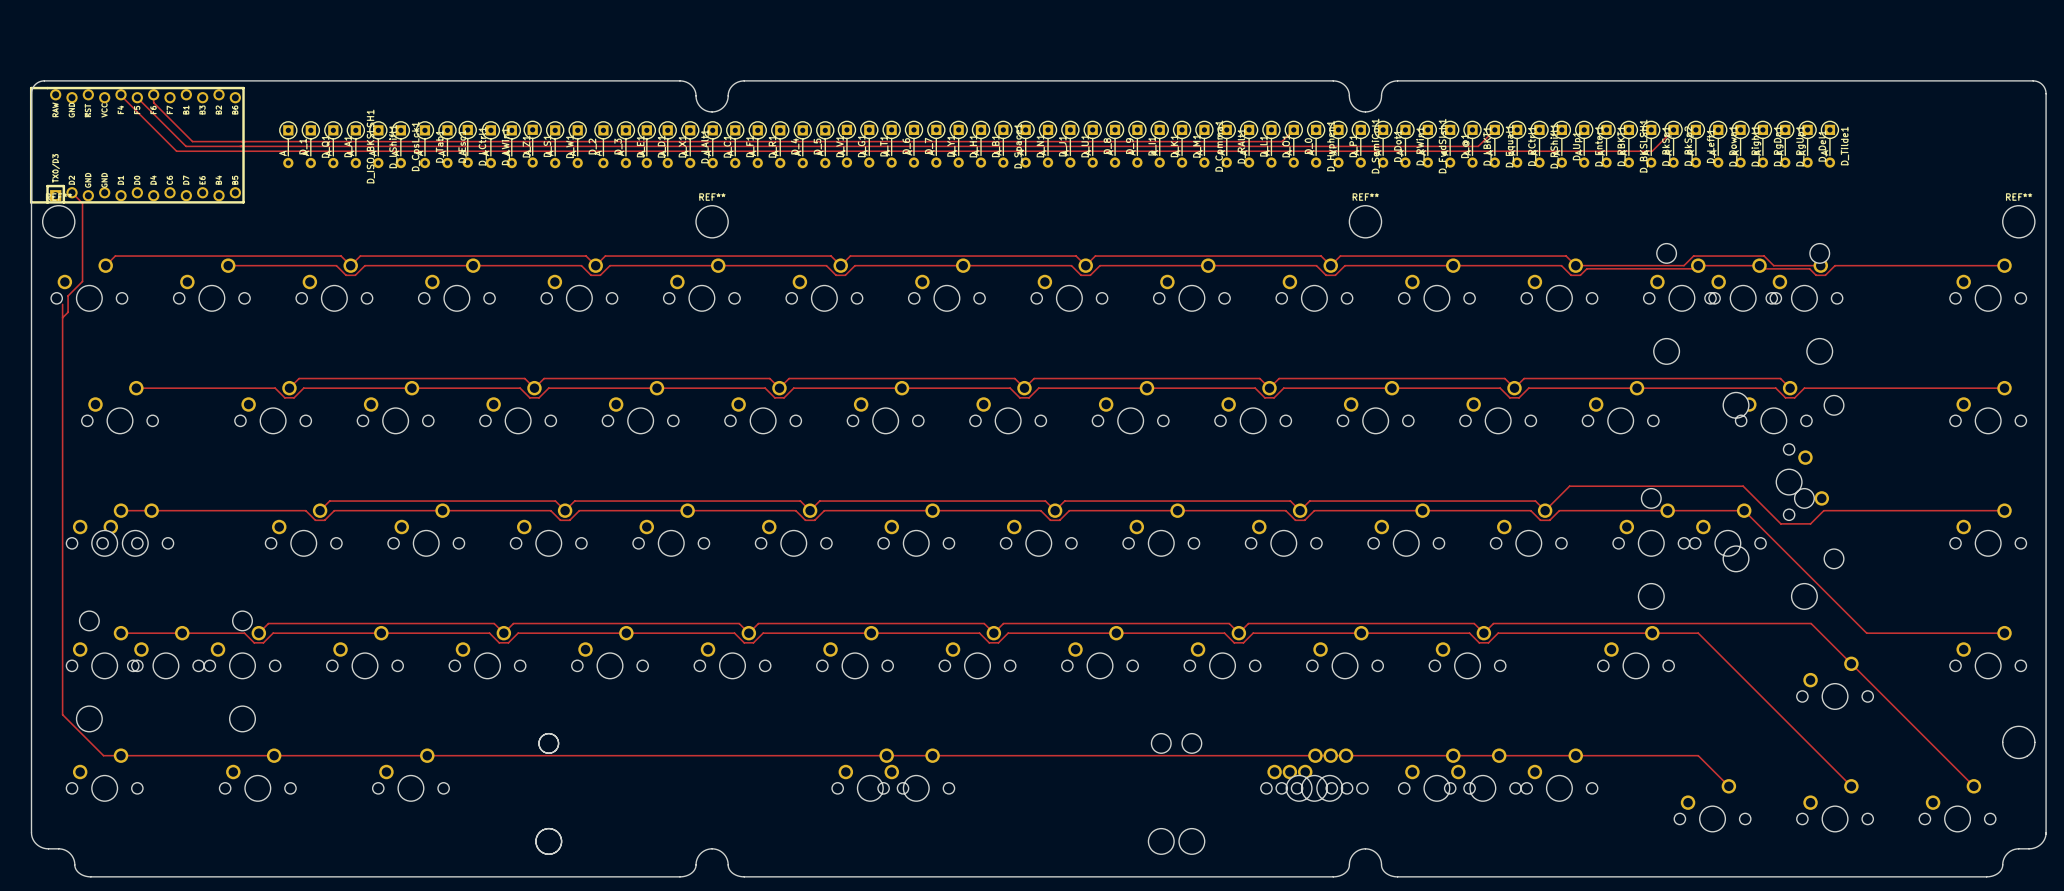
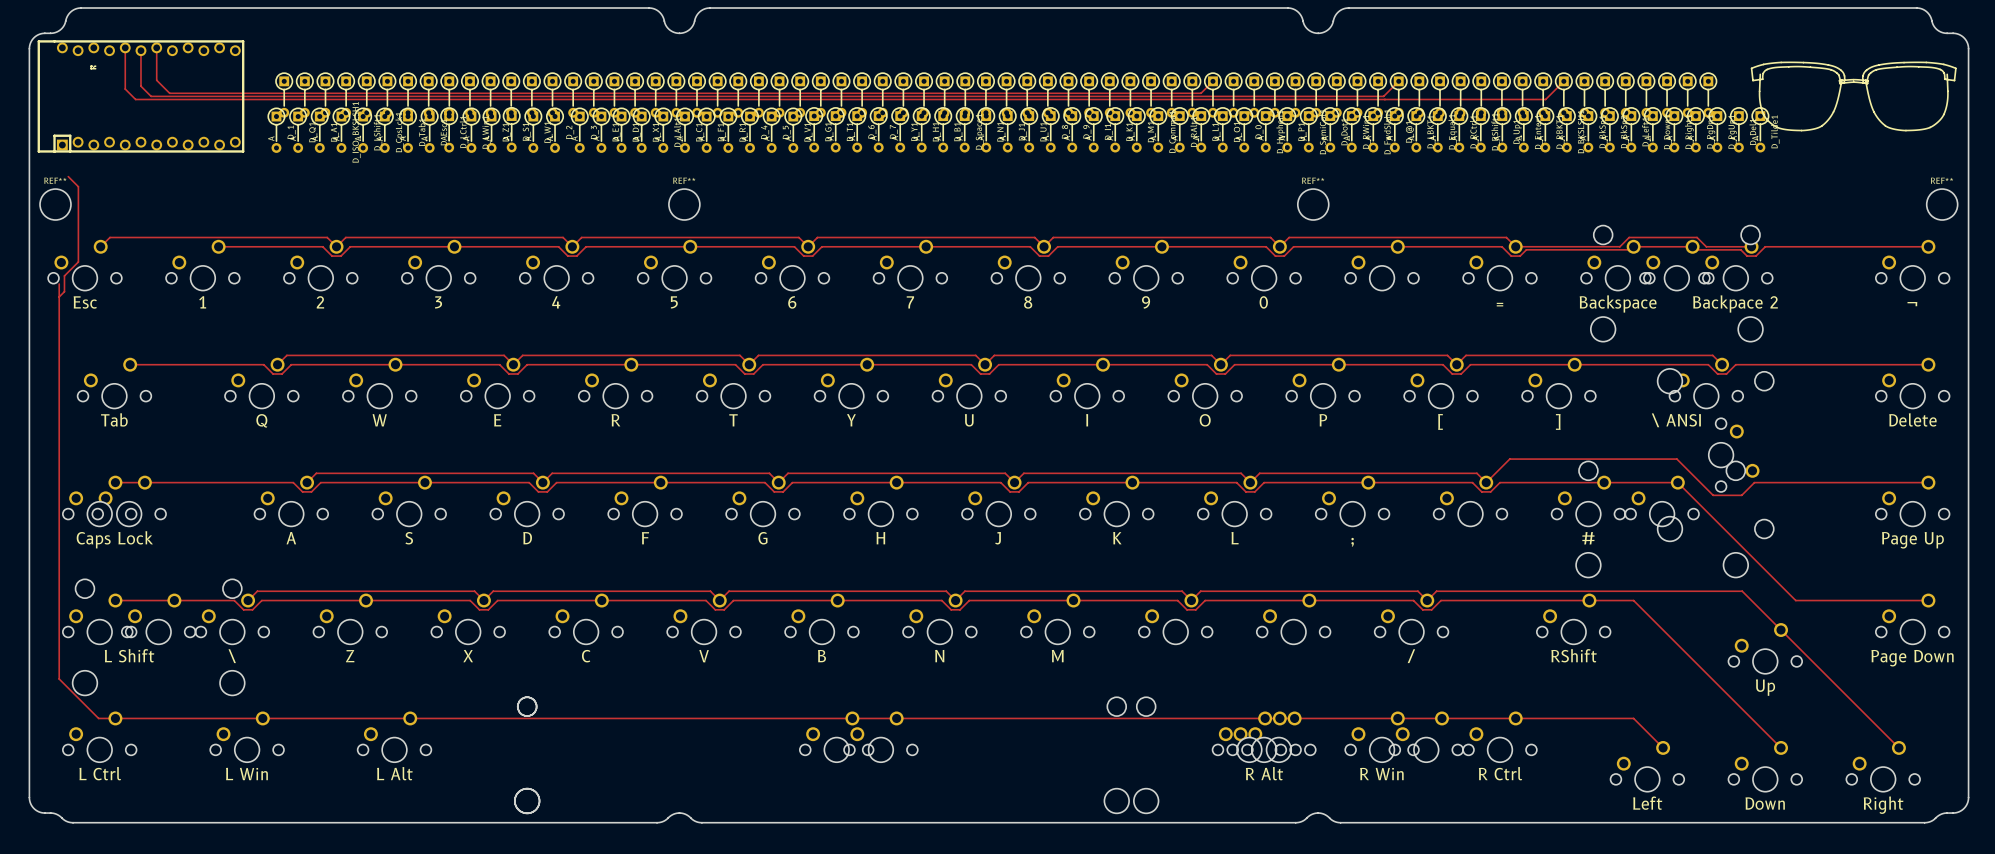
track: none -> (125, 47) (125, 89) (135, 99) (1545, 99) (1563, 81)
track: none -> (156, 47) (156, 80) (169, 93) (1201, 93) (1212, 81)
board edge: none -> (1968, 48) (1968, 797) (1965, 806) (1959, 811) (1942, 813) (1931, 821) (1924, 822) (1340, 822) (1318, 813) (1295, 822) (701, 822) (679, 813) (657, 822) (73, 822) (66, 821) (55, 813) (38, 811) (30, 803) (29, 47) (32, 40) (37, 35) (54, 32) (60, 29) (68, 14) (75, 9) (649, 8) (660, 12) (669, 29) (679, 33) (689, 29) (698, 12) (709, 8) (1287, 8) (1298, 12) (1308, 29) (1318, 33) (1328, 29) (1337, 12) (1348, 8) (1916, 8) (1927, 12) (1938, 30) (1962, 36) (1967, 42) (1968, 45) (1968, 47) (1968, 48)
track: none -> (140, 50) (140, 86) (151, 96) (1383, 96) (1398, 81)
line: none -> (1781, 62) (1764, 64) (1751, 68) (1752, 80) (1762, 79) (1763, 72) (1769, 68) (1799, 66) (1831, 70) (1838, 74) (1840, 83) (1844, 82) (1843, 72) (1833, 66) (1813, 63) (1781, 62)
line: none -> (1926, 62) (1943, 64) (1955, 68) (1954, 80) (1944, 79) (1943, 72) (1937, 68) (1907, 66) (1875, 70) (1868, 74) (1866, 83) (1863, 82) (1864, 72) (1873, 66) (1894, 63) (1926, 62)
line: none -> (1760, 74) (1759, 98) (1764, 115) (1775, 126) (1791, 130) (1813, 129) (1825, 122) (1835, 107) (1841, 79)
line: none -> (1947, 74) (1947, 98) (1943, 115) (1931, 126) (1916, 130) (1893, 129) (1881, 122) (1872, 107) (1865, 79)
line: none -> (1853, 79) (1839, 80) (1839, 83) (1867, 83) (1868, 80) (1853, 79)
track: (121, 94) (176, 151) (1652, 151) (1673, 129) -> none
track: (153, 94) (153, 102) (192, 141) (1282, 141) (1293, 129) -> none
track: (137, 97) (186, 146) (1478, 146) (1494, 129) -> none
part: none -> (284, 95)
part: none -> (304, 95)
part: none -> (325, 95)
part: none -> (346, 95)
part: none -> (366, 95)
part: none -> (387, 95)
part: none -> (408, 95)
part: none -> (428, 95)
part: none -> (449, 95)
part: none -> (469, 95)
part: none -> (490, 95)
part: none -> (511, 95)
part: none -> (531, 95)
part: none -> (552, 95)
part: none -> (573, 95)
part: none -> (593, 95)
part: none -> (614, 95)
part: none -> (635, 95)
part: none -> (655, 95)
part: none -> (676, 95)
part: none -> (697, 95)
part: none -> (717, 95)
part: none -> (738, 95)
part: none -> (758, 95)
part: none -> (779, 95)
part: none -> (800, 95)
part: none -> (820, 95)
part: none -> (841, 95)
part: none -> (862, 95)
part: none -> (882, 95)
part: none -> (903, 95)
part: none -> (924, 95)
part: none -> (944, 95)
part: none -> (965, 95)
part: none -> (985, 95)
part: none -> (1006, 95)
part: none -> (1027, 95)
part: none -> (1047, 95)
part: none -> (1068, 95)
part: none -> (1089, 95)
part: none -> (1109, 95)
part: none -> (1130, 95)
part: none -> (1151, 95)
part: none -> (1171, 95)
part: none -> (1192, 95)
part: none -> (1212, 95)
part: none -> (1233, 95)
part: none -> (1254, 95)
part: none -> (1274, 95)
part: none -> (1295, 95)
part: none -> (1316, 95)
part: none -> (1336, 95)
part: none -> (1357, 95)
part: none -> (1378, 95)
part: none -> (1398, 95)
part: none -> (1419, 95)
part: none -> (1440, 95)
part: none -> (1460, 95)
part: none -> (1481, 95)
part: none -> (1501, 95)
part: none -> (1522, 95)
part: none -> (1543, 95)
part: none -> (1563, 95)
part: none -> (1584, 95)
part: none -> (1605, 95)
part: none -> (1625, 95)
part: none -> (1646, 95)
part: none -> (1667, 95)
part: none -> (1687, 95)
part: none -> (1708, 95)
part: none -> (140, 96)
part: (137, 145) -> none
Esc name: none -> Esc (85, 302)
1 name: none -> 1 (202, 302)
2 name: none -> 2 (320, 302)
3 name: none -> 3 (438, 302)
4 name: none -> 4 (556, 302)
5 name: none -> 5 (674, 302)
6 name: none -> 6 (792, 302)
7 name: none -> 7 (910, 302)
8 name: none -> 8 (1028, 302)
9 name: none -> 9 (1146, 302)
0 name: none -> 0 (1263, 302)
part name: none -> = (1499, 304)
Backspace name: none -> Backspace (1618, 303)
Backpace 2 name: none -> Backpace 2 (1735, 303)
part name: none -> ¬ (1912, 304)
Tab name: none -> Tab (114, 419)
W name: none -> W (379, 420)
E name: none -> E (497, 420)
R name: none -> R (615, 420)
T name: none -> T (733, 420)
Y name: none -> Y (851, 420)
U name: none -> U (969, 420)
I name: none -> I (1087, 420)
O name: none -> O (1205, 420)
P name: none -> P (1323, 420)
Delete name: none -> Delete (1912, 419)
Q name: none -> Q (261, 420)
\ ANSI name: none -> \ ANSI (1676, 420)
part name: none -> [ (1440, 421)
part name: none -> ] (1558, 421)
A name: none -> A (291, 538)
S name: none -> S (409, 538)
D name: none -> D (527, 538)
F name: none -> F (645, 538)
G name: none -> G (762, 538)
H name: none -> H (880, 538)
J name: none -> J (998, 538)
K name: none -> K (1117, 538)
L name: none -> L (1235, 538)
part name: none -> # (1588, 538)
Caps Lock name: none -> Caps Lock (114, 539)
Page Up name: none -> Page Up (1912, 540)
part name: none -> ; (1352, 542)
L Shift name: none -> L Shift (129, 655)
Z name: none -> Z (350, 656)
X name: none -> X (468, 656)
C name: none -> C (586, 656)
V name: none -> V (704, 656)
B name: none -> B (821, 656)
N name: none -> N (939, 656)
M name: none -> M (1057, 656)
RShift name: none -> RShift (1574, 655)
part name: none -> \ (232, 656)
part name: none -> / (1411, 656)
Page Down name: none -> Page Down (1912, 658)
Up name: none -> Up (1765, 687)
board edge: (2010, 728) (2022, 726) (2032, 734) (2034, 746) (2026, 756) (2014, 757) (2004, 750) (2003, 738) (2010, 728) -> none
L Ctrl name: none -> L Ctrl (100, 773)
L Win name: none -> L Win (246, 774)
L Alt name: none -> L Alt (394, 773)
R Alt name: none -> R Alt (1264, 773)
R Win name: none -> R Win (1381, 774)
R Ctrl name: none -> R Ctrl (1500, 773)
board edge: (2046, 832) (2045, 834) (2045, 836) (2044, 840) (2037, 846) (2009, 851) (2004, 857) (1999, 871) (1986, 876) (1395, 876) (1384, 871) (1376, 853) (1365, 848) (1359, 850) (1353, 854) (1345, 872) (1333, 876) (742, 876) (730, 871) (723, 853) (712, 848) (700, 853) (693, 871) (681, 876) (83, 875) (76, 869) (73, 858) (68, 852) (61, 849) (40, 846) (34, 841) (31, 834) (32, 88) (37, 83) (44, 80) (679, 80) (691, 85) (699, 106) (705, 110) (712, 111) (723, 107) (730, 87) (742, 80) (1333, 80) (1344, 85) (1353, 106) (1359, 110) (1365, 111) (1371, 110) (1377, 106) (1386, 85) (1397, 80) (2038, 81) (2043, 86) (2046, 93) (2046, 834) -> none
Left name: none -> Left (1647, 803)
Down name: none -> Down (1765, 803)
Right name: none -> Right (1883, 805)

